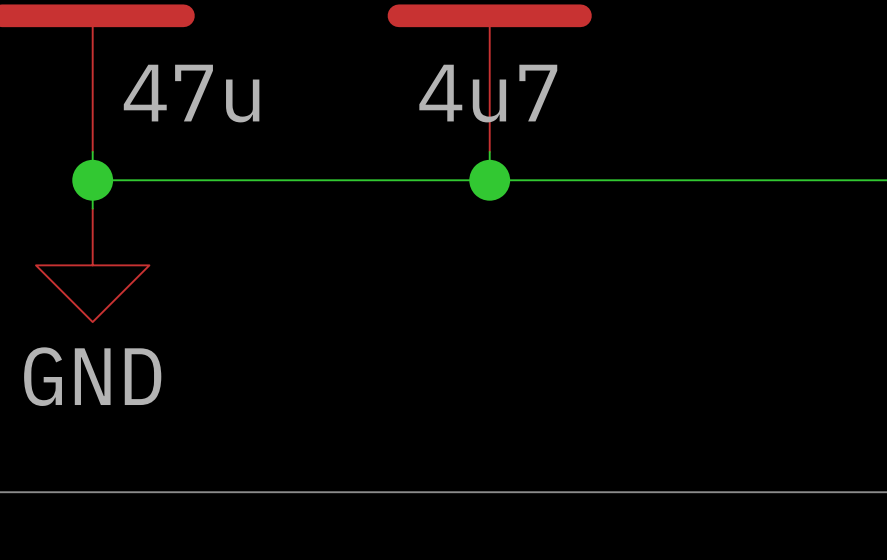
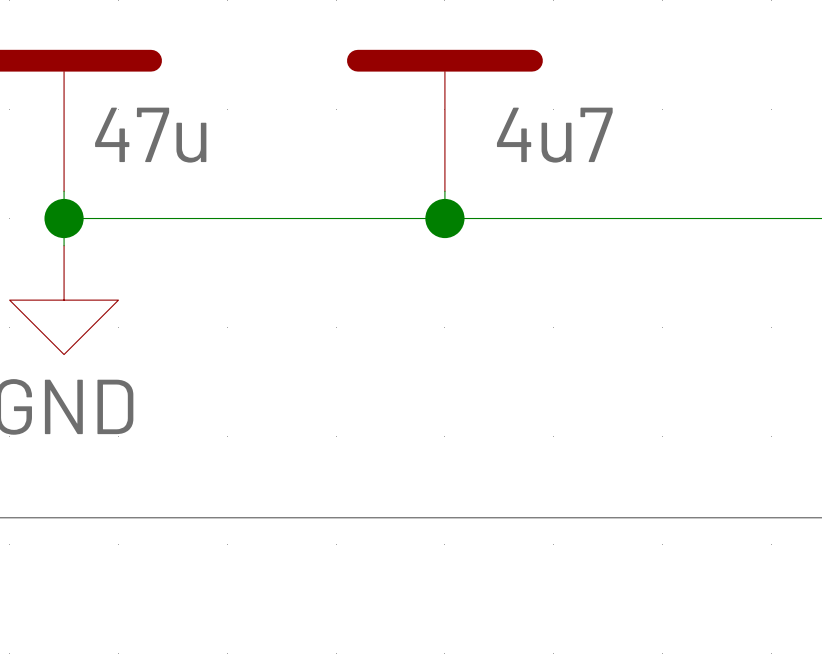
part text position: 4u7 (488, 93) -> 4u7 (554, 135)

